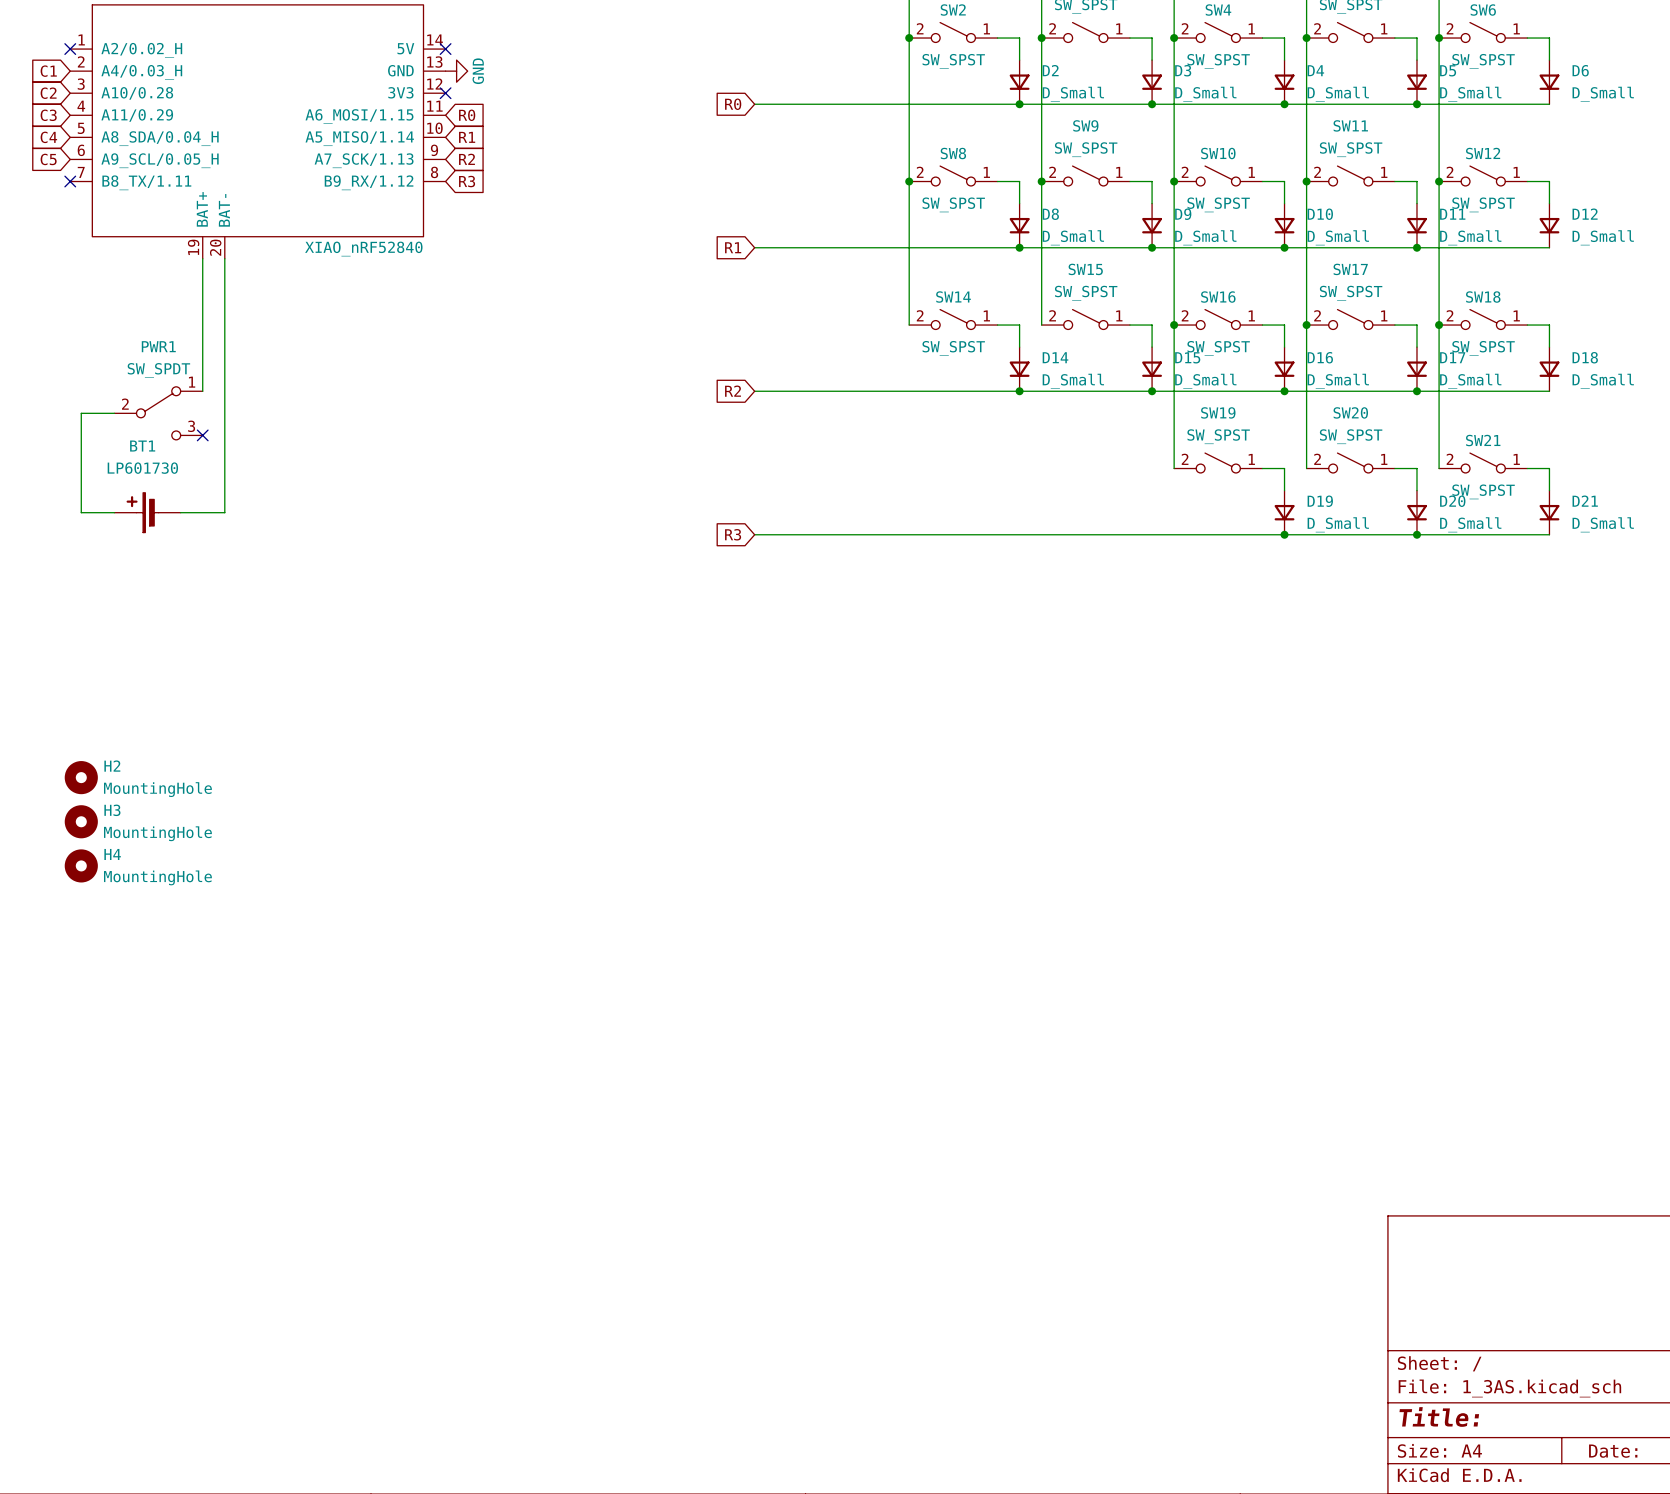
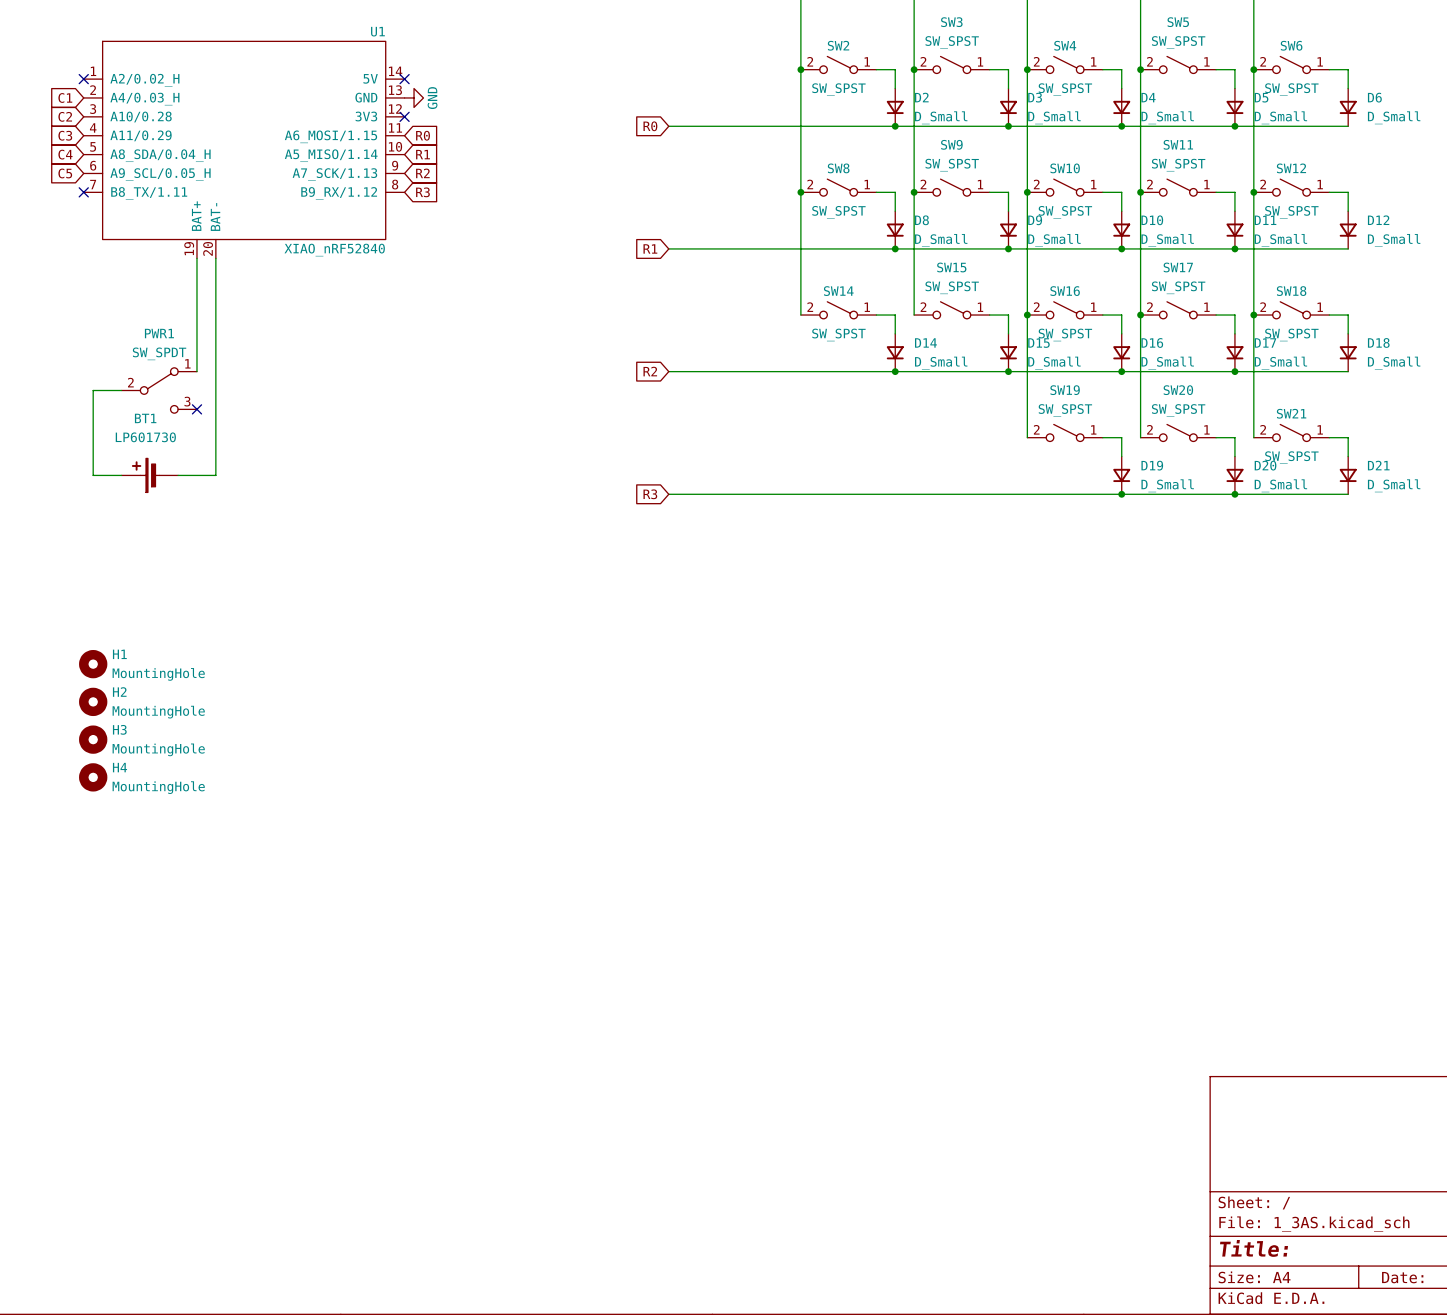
H1: none -> MountingHole (93, 664)

